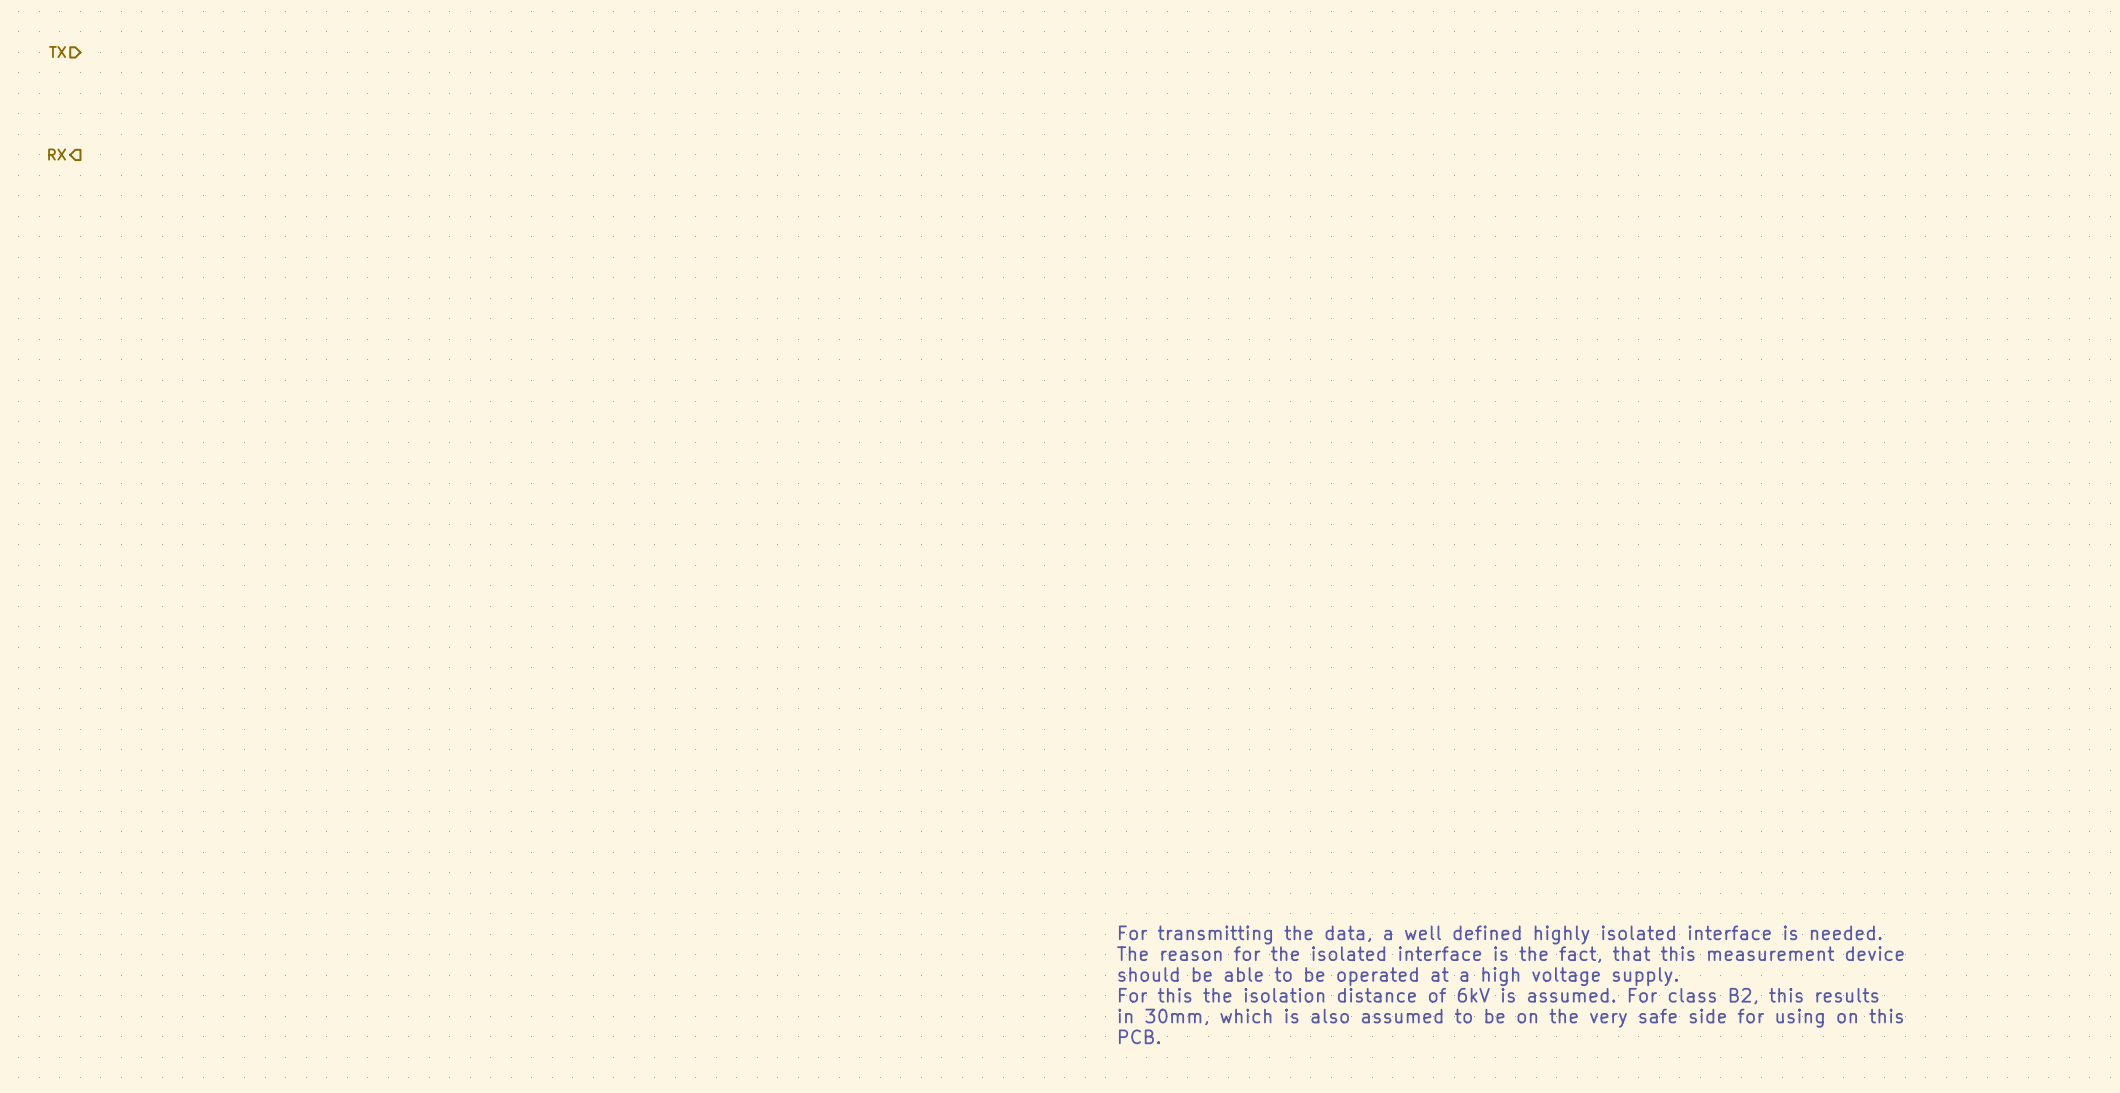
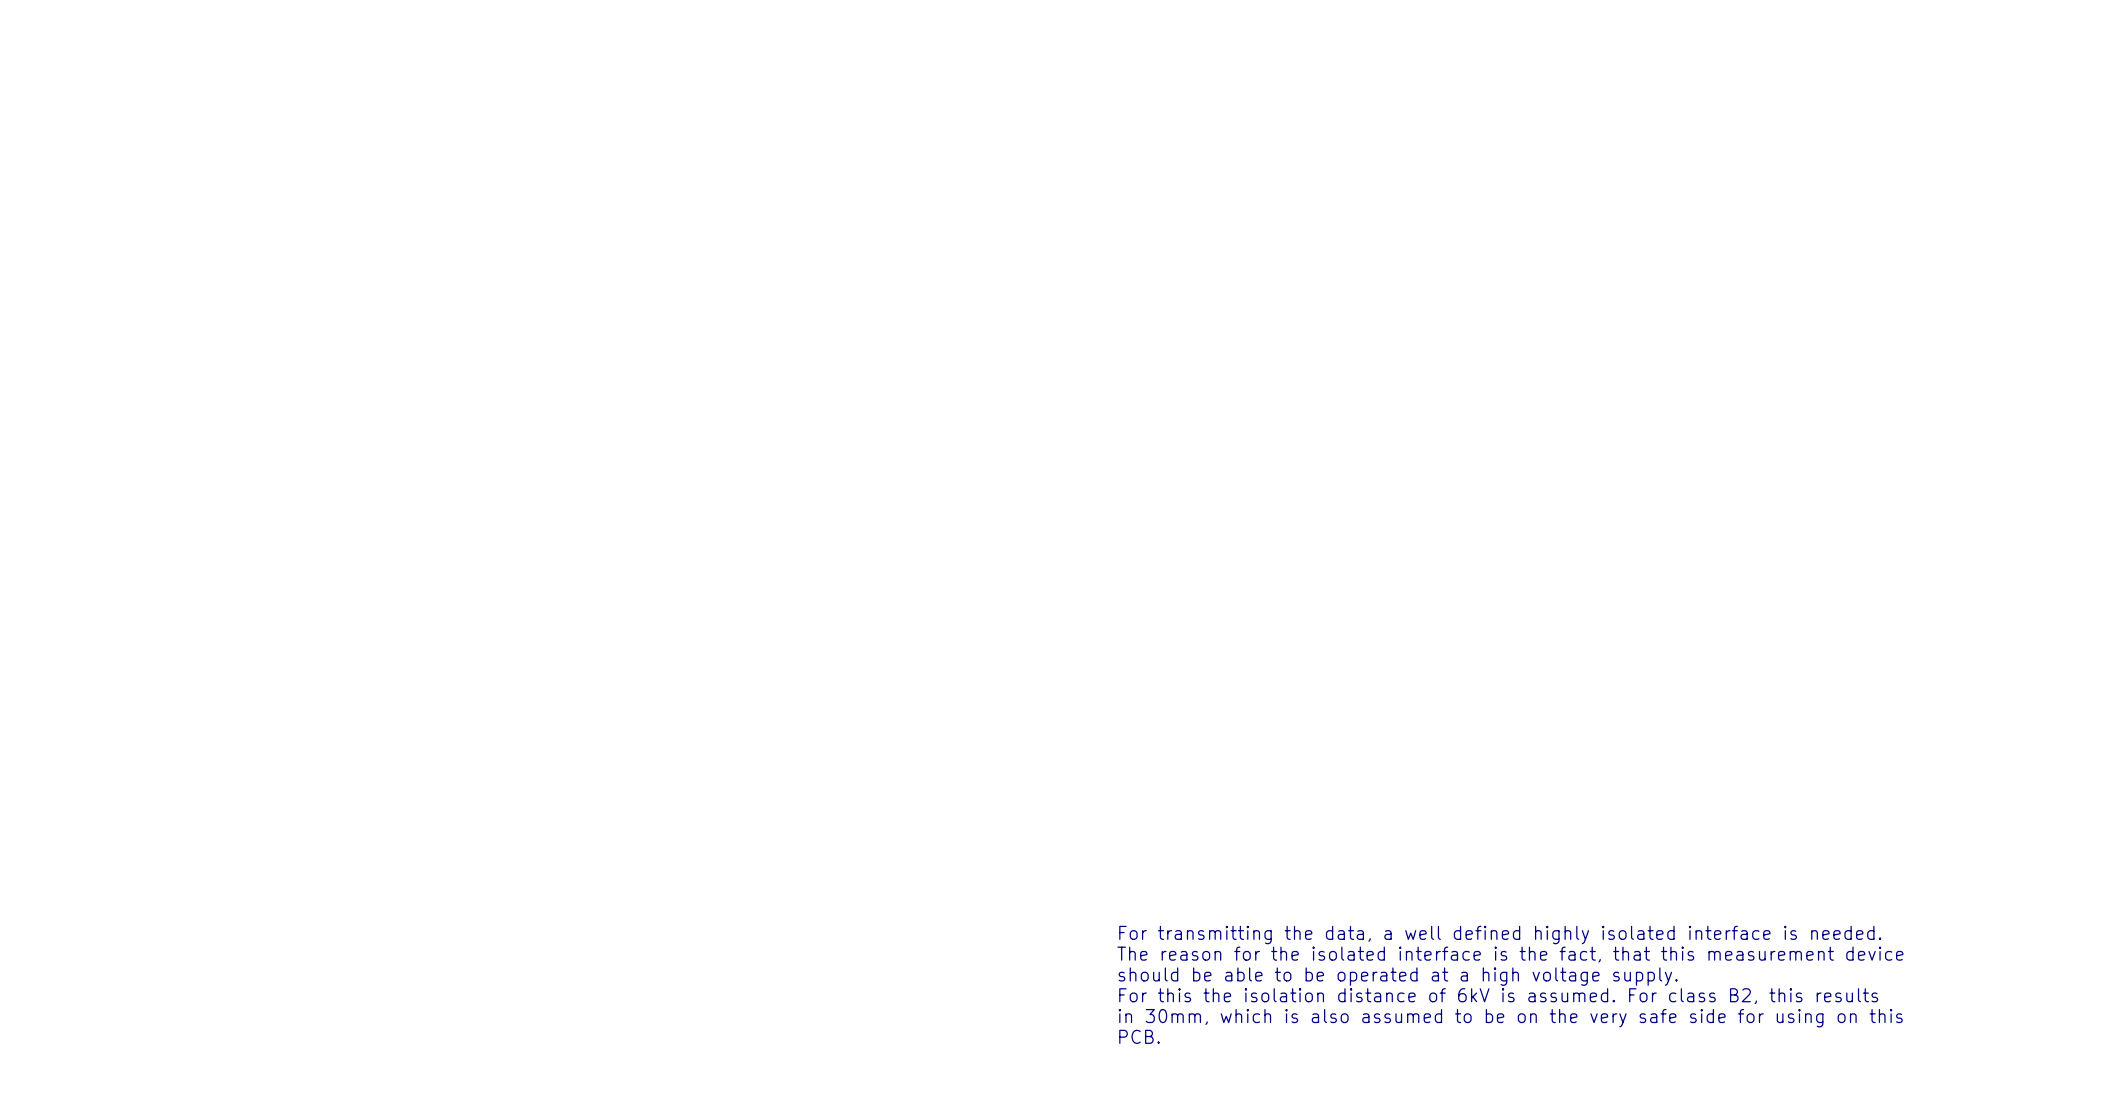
hierarchical label: TX (57, 52) -> none
hierarchical label: RX (57, 154) -> none

